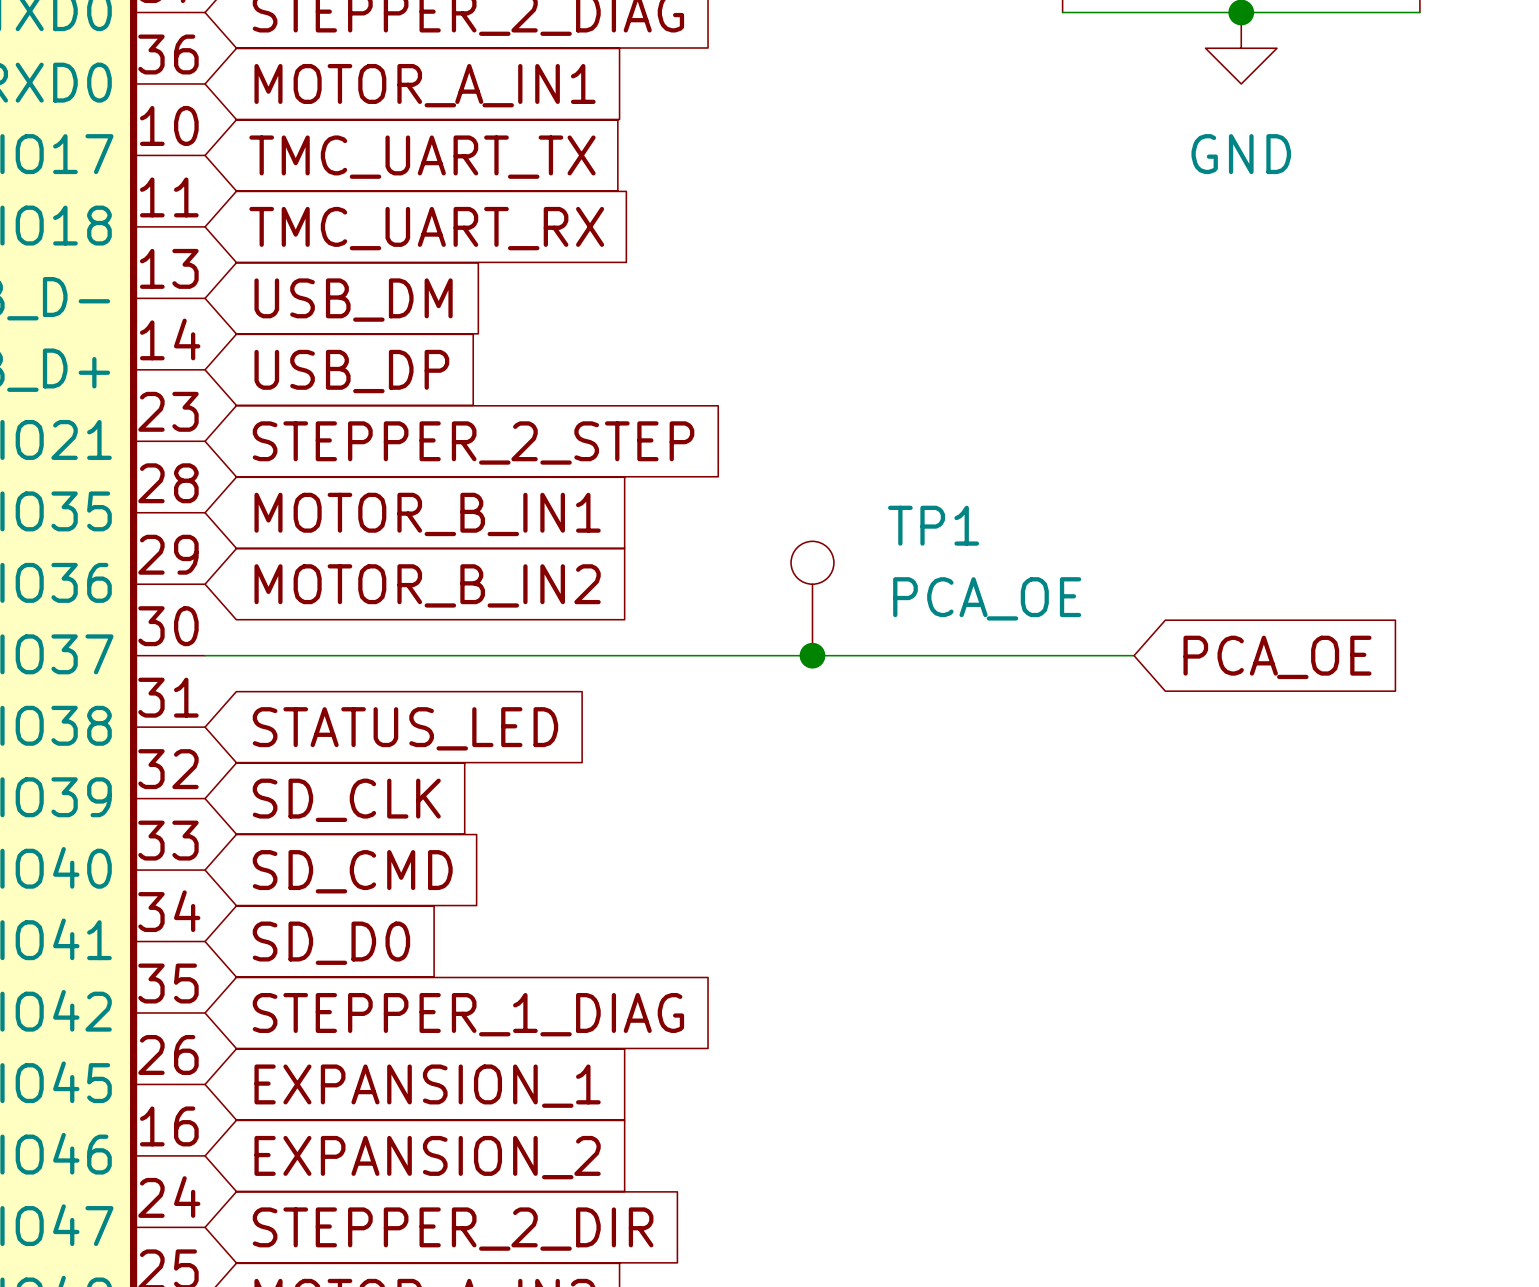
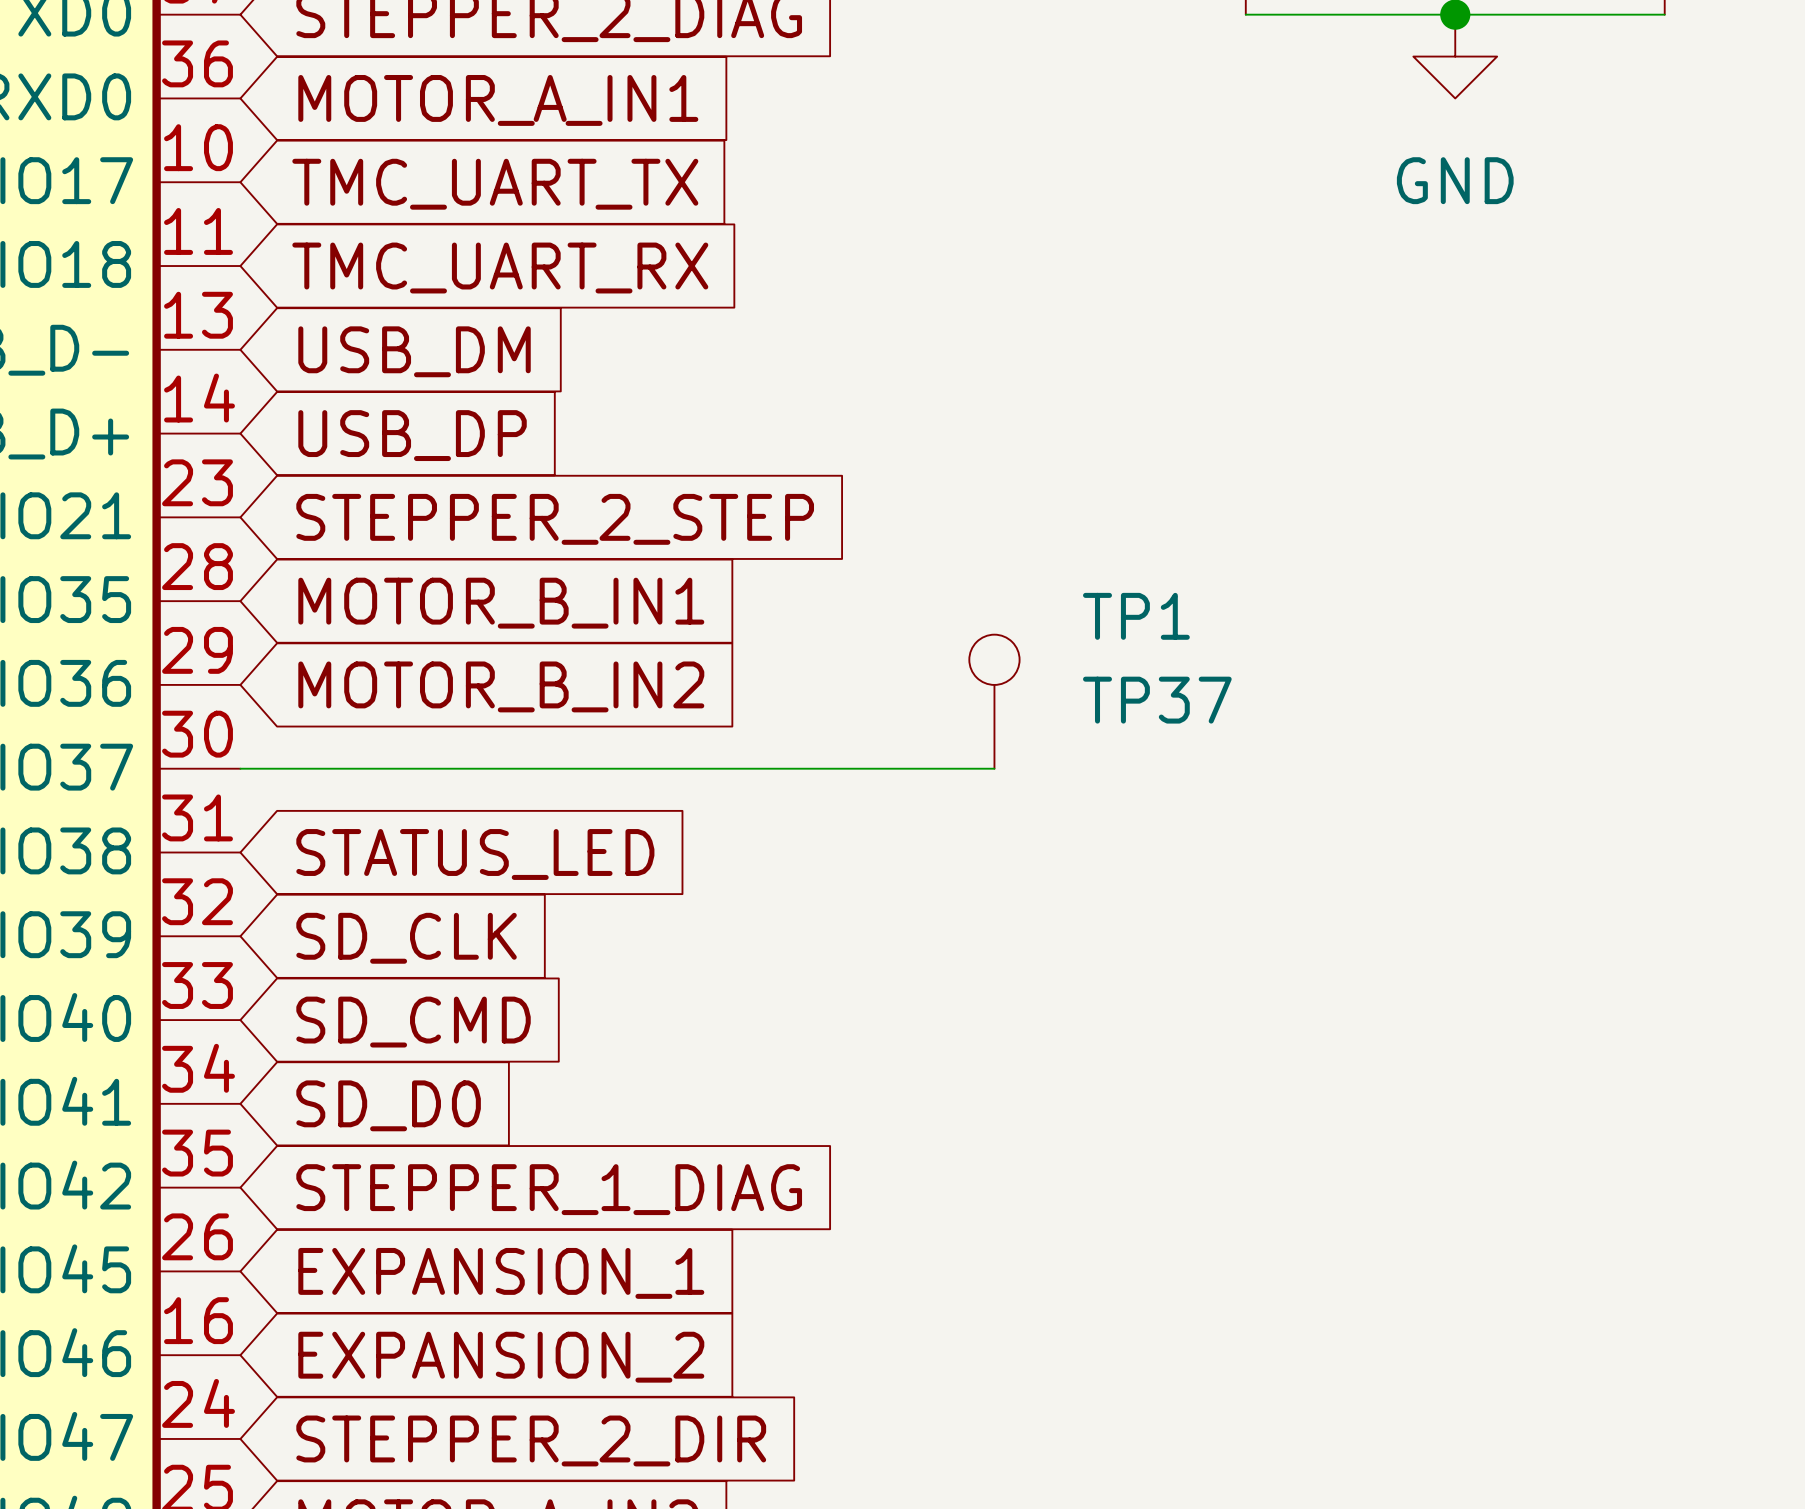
TP1 position: (812, 598) -> (994, 701)
TP1 value: PCA_OE (987, 598) -> TP37 (1157, 700)
junction: (812, 655) -> none
wire: (848, 655) (1134, 655) -> none
global label: PCA_OE (1277, 657) -> none

